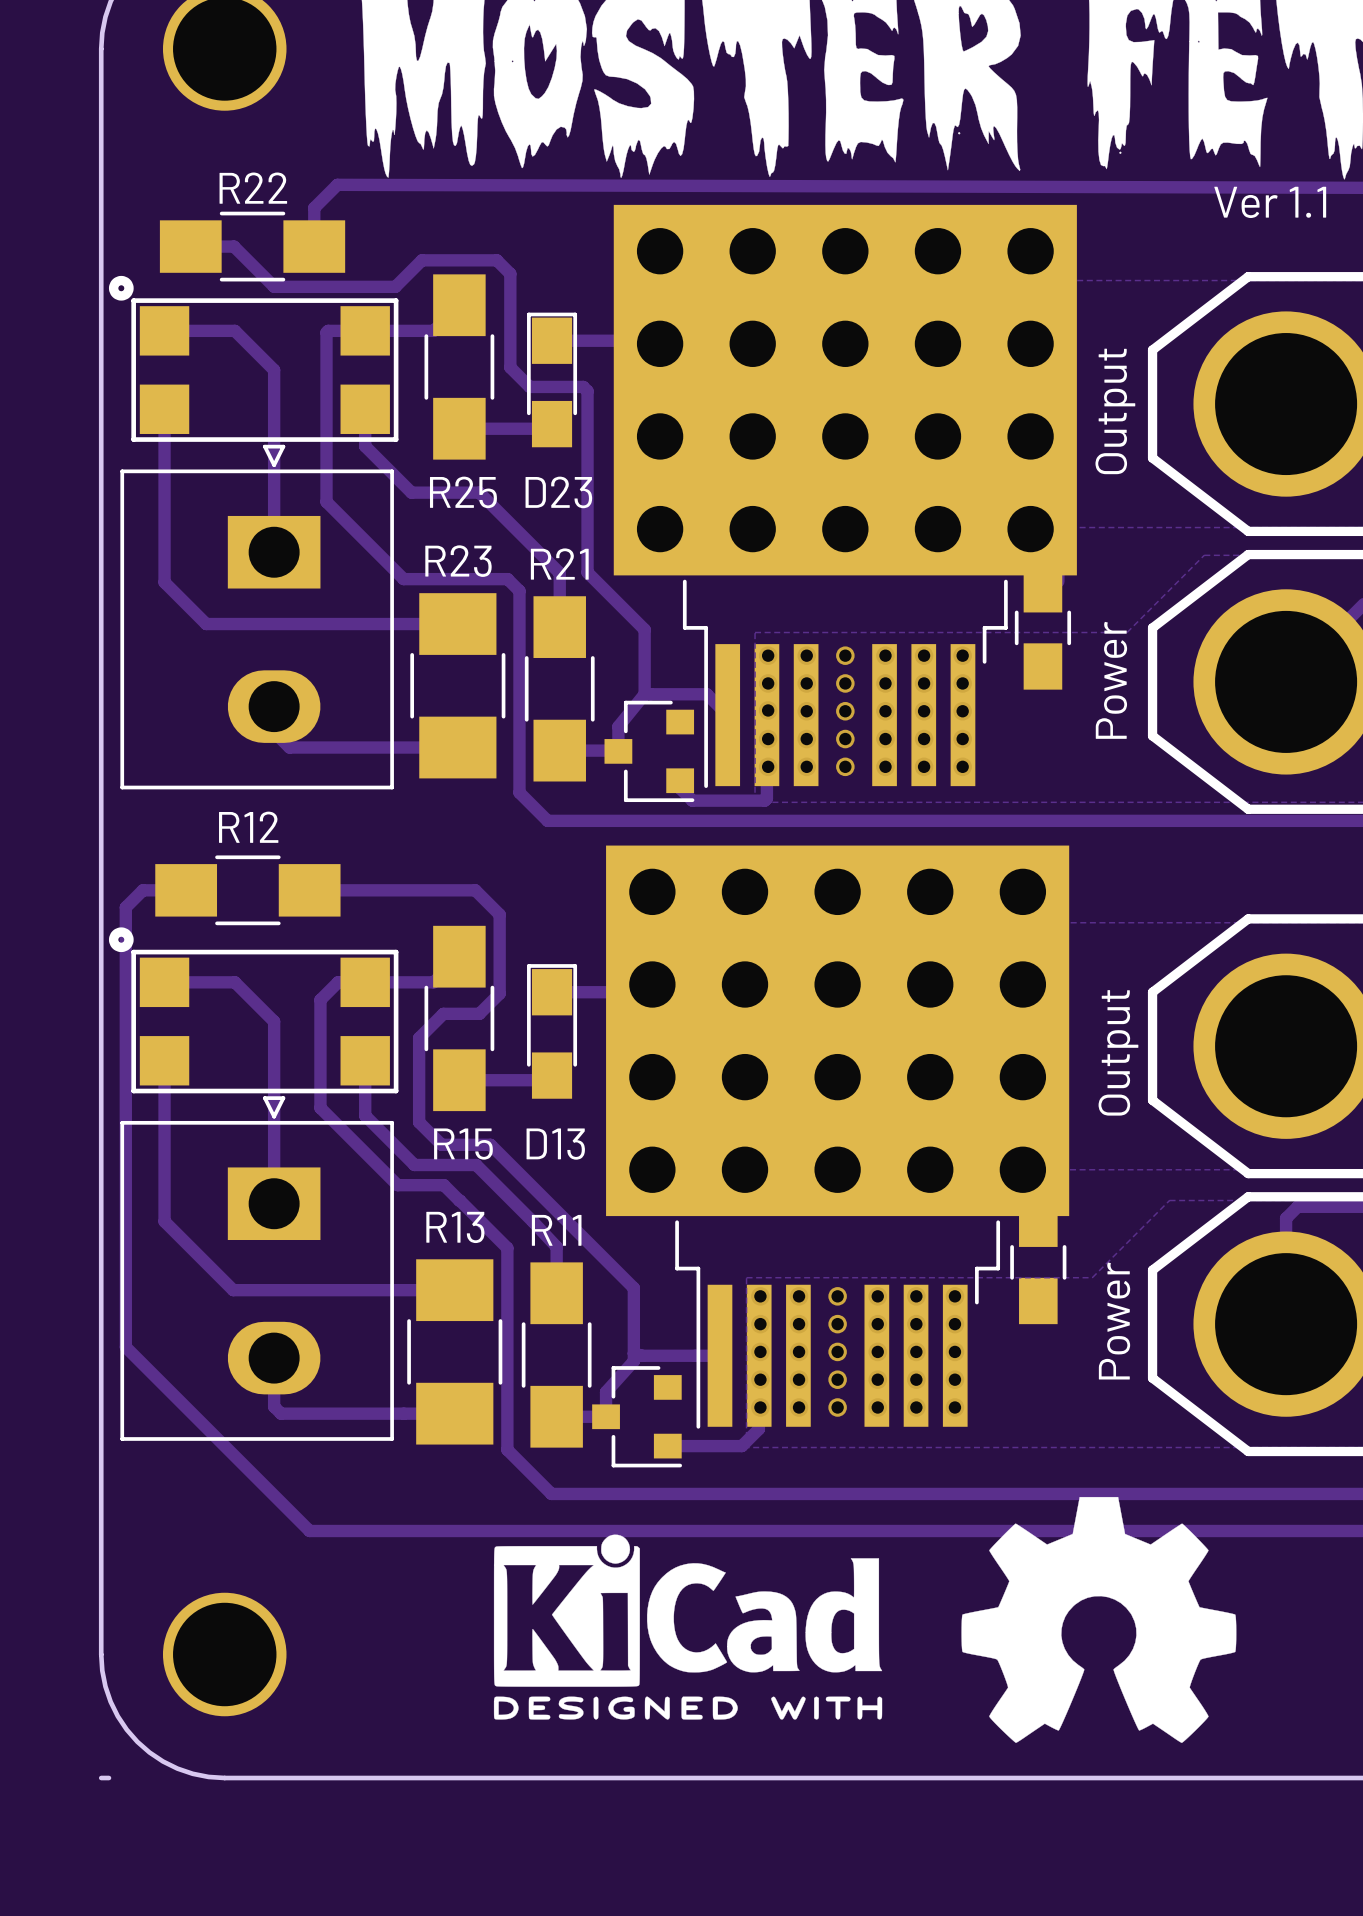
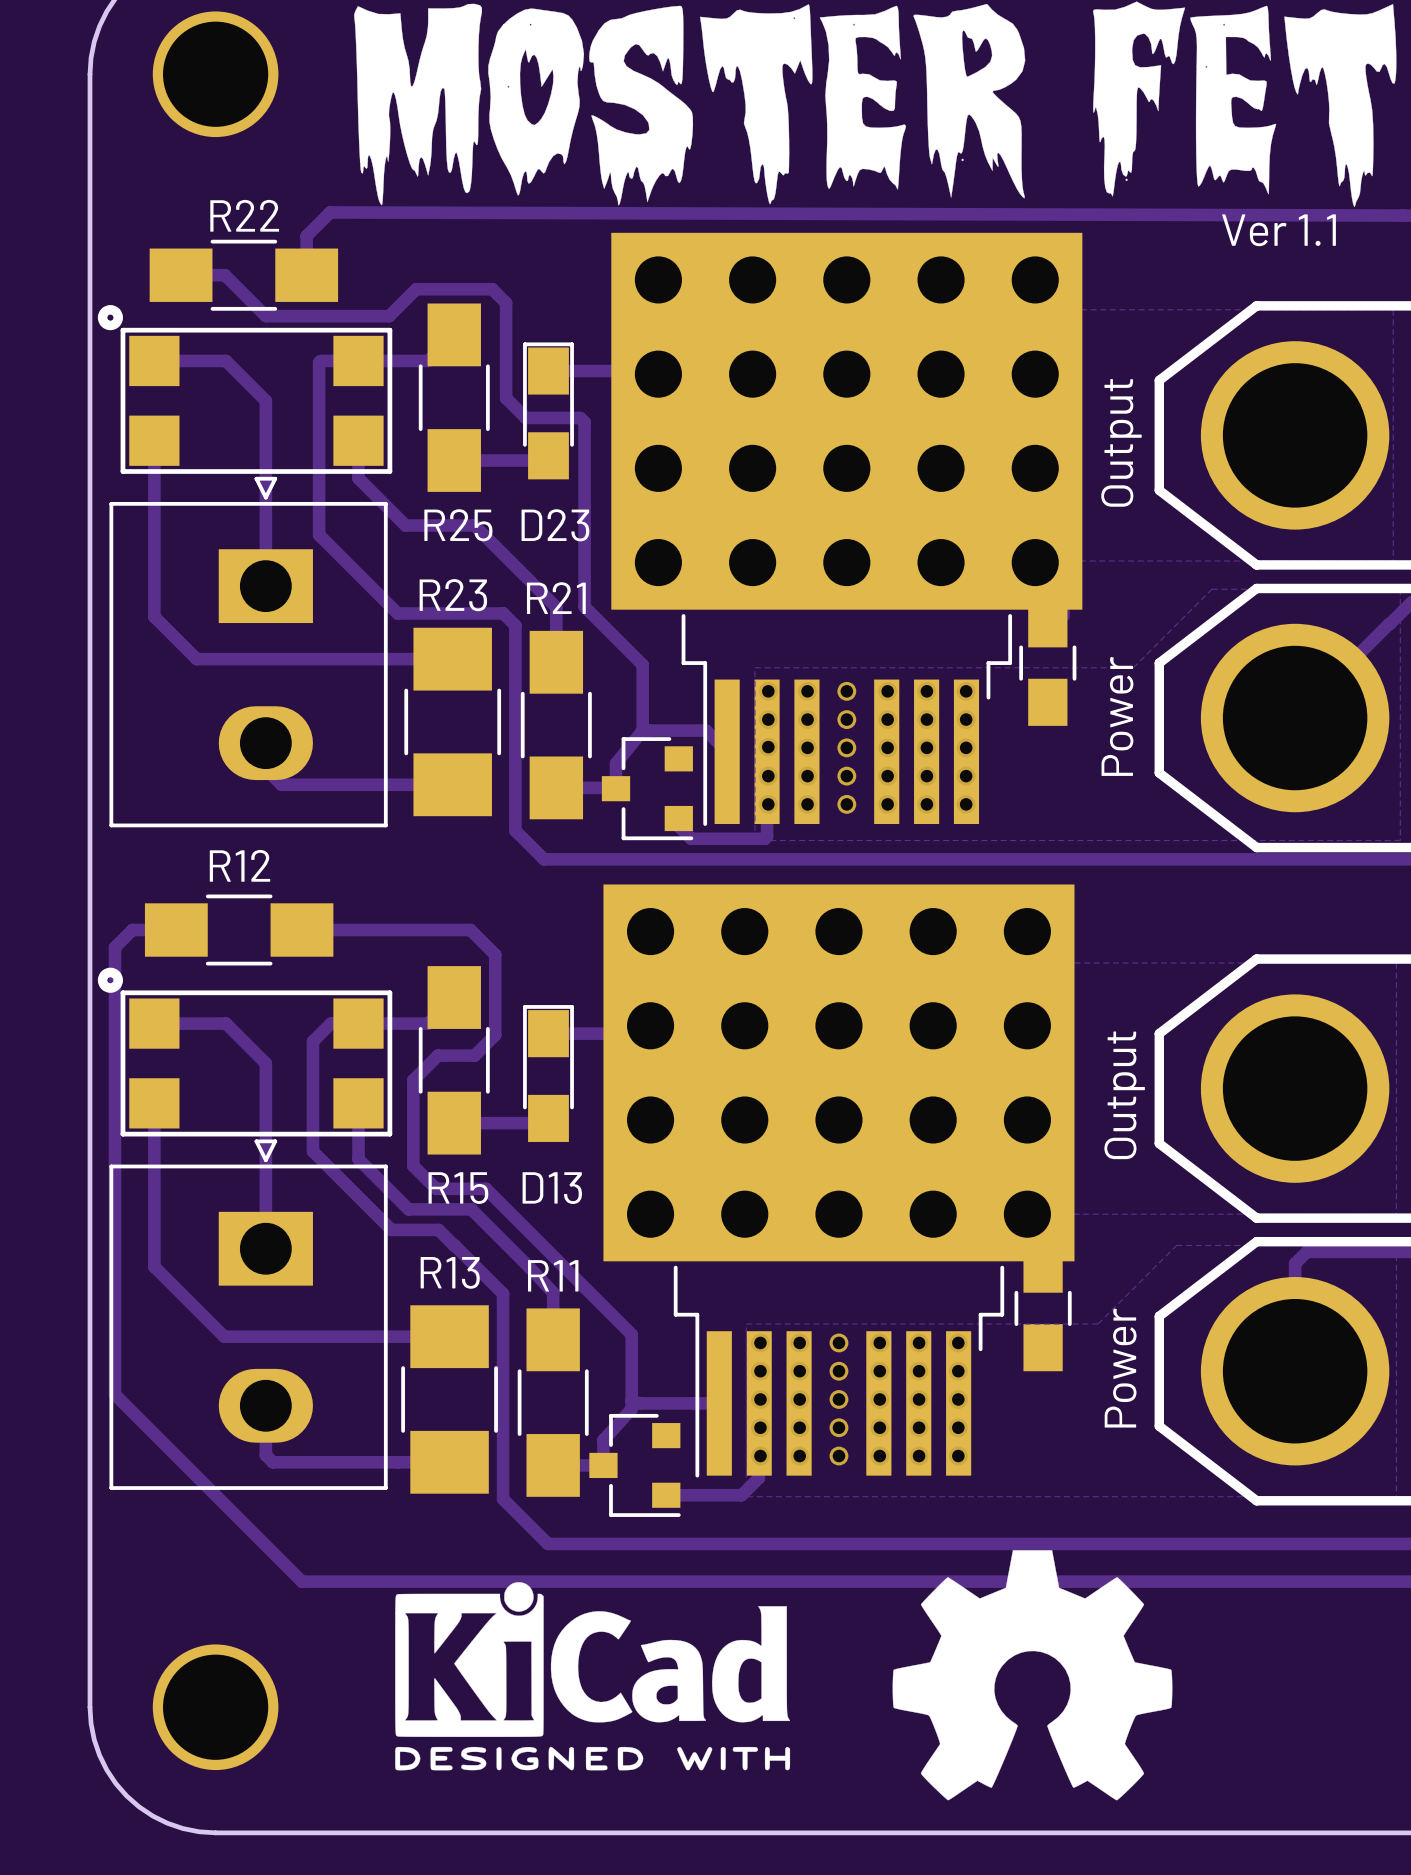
drawing position: (1098, 1619) -> (1032, 1675)
drawing position: (688, 1627) -> (592, 1676)
board edge: (101, 1778) (108, 1778) -> none

